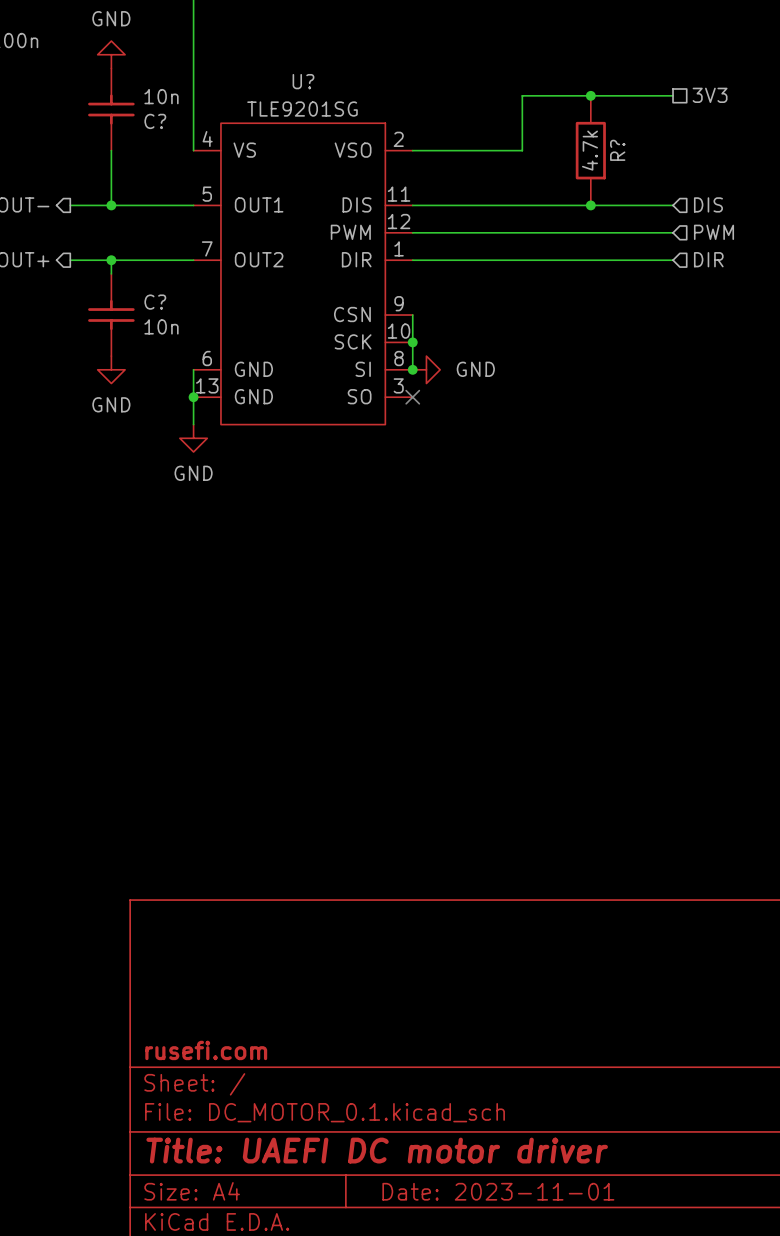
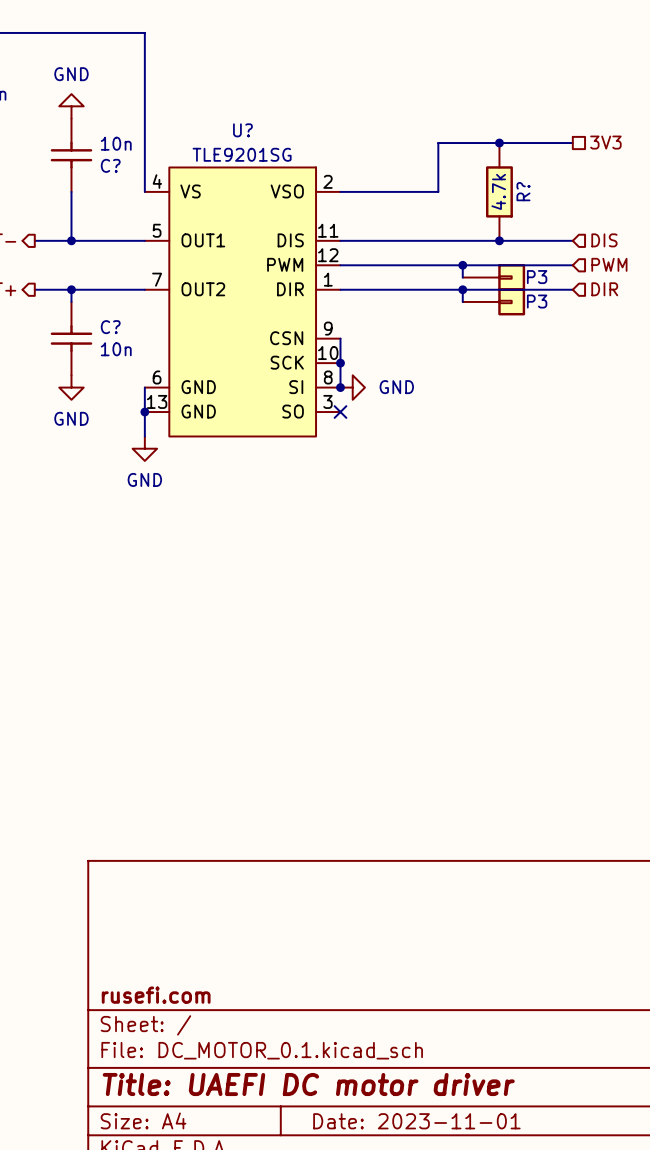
wire: none -> (462, 265) (462, 277)
junction: none -> (462, 265)
P3: none -> (493, 277)
wire: none -> (462, 289) (462, 301)
junction: none -> (462, 289)
P3: none -> (493, 301)

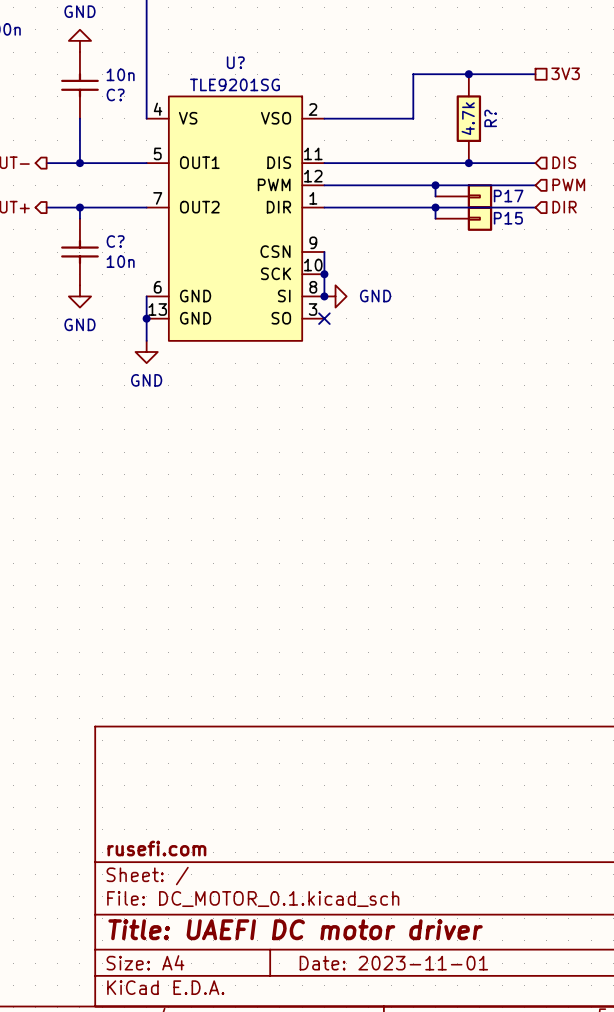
P3 name: P3 (537, 277) -> P17 (508, 196)
P3 name: P3 (537, 301) -> P15 (508, 218)

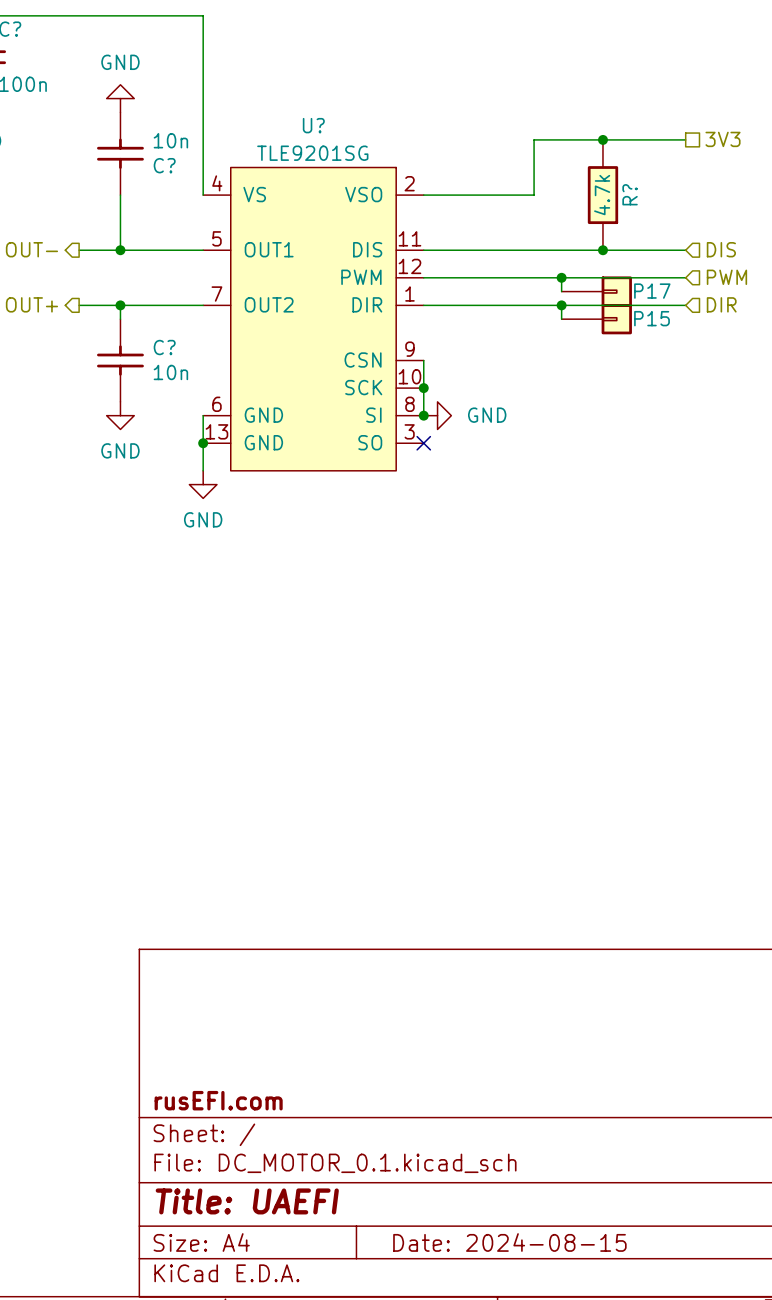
title block: rusefi.com (156, 848) -> rusEFI.com (218, 1100)
title block: Title: UAEFI DC motor driver (295, 929) -> Title: UAEFI (247, 1201)
title block: Date: 2023-11-01 (393, 963) -> Date: 2024-08-15 (509, 1242)

